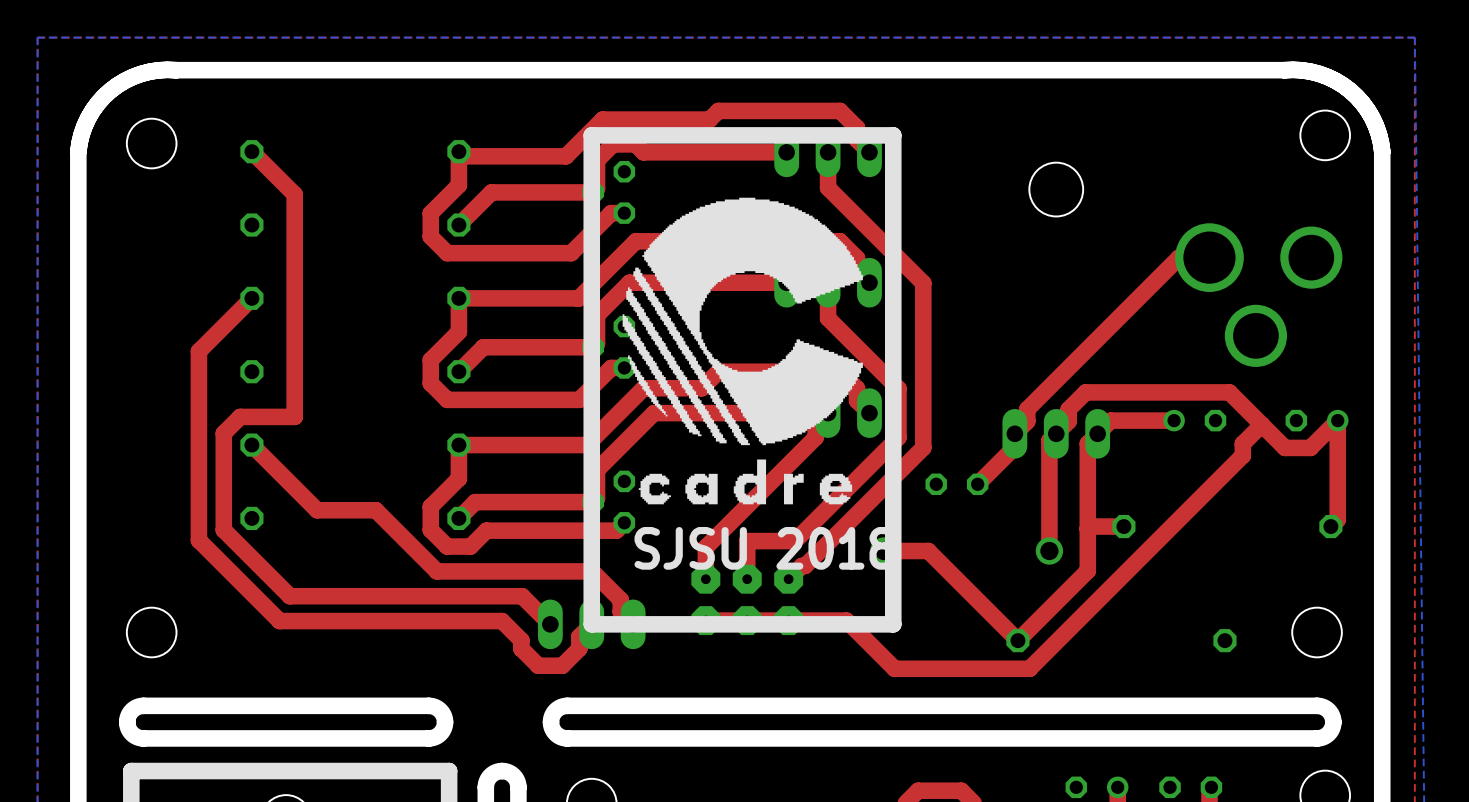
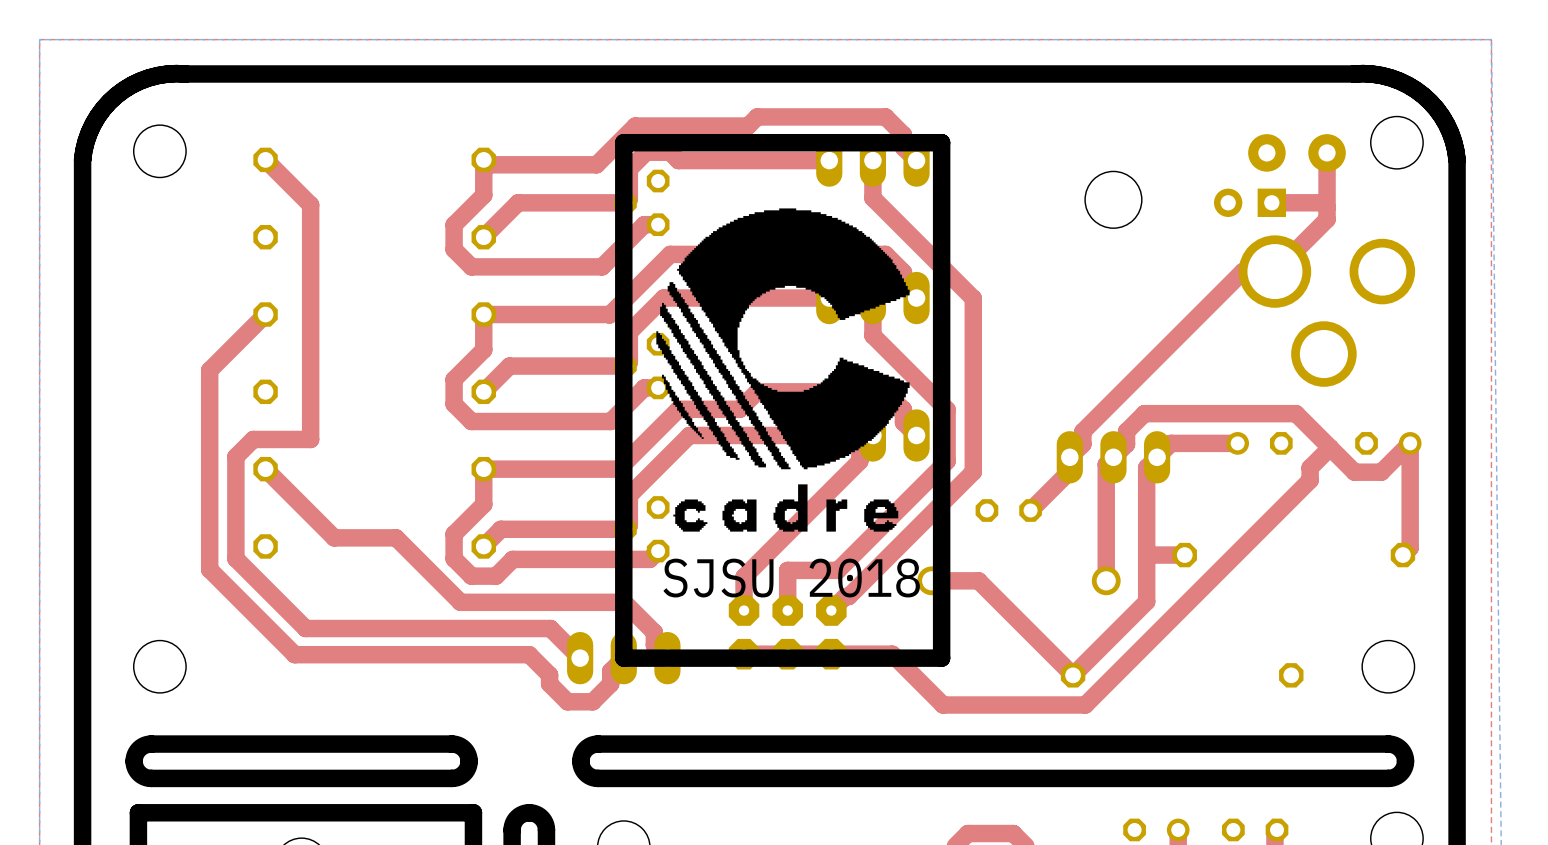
part: none -> (1296, 152)
top track: none -> (1327, 152) (1327, 219) (1274, 271)
part: none -> (1249, 202)
top track: none -> (1271, 202) (1322, 202) (1327, 207)

